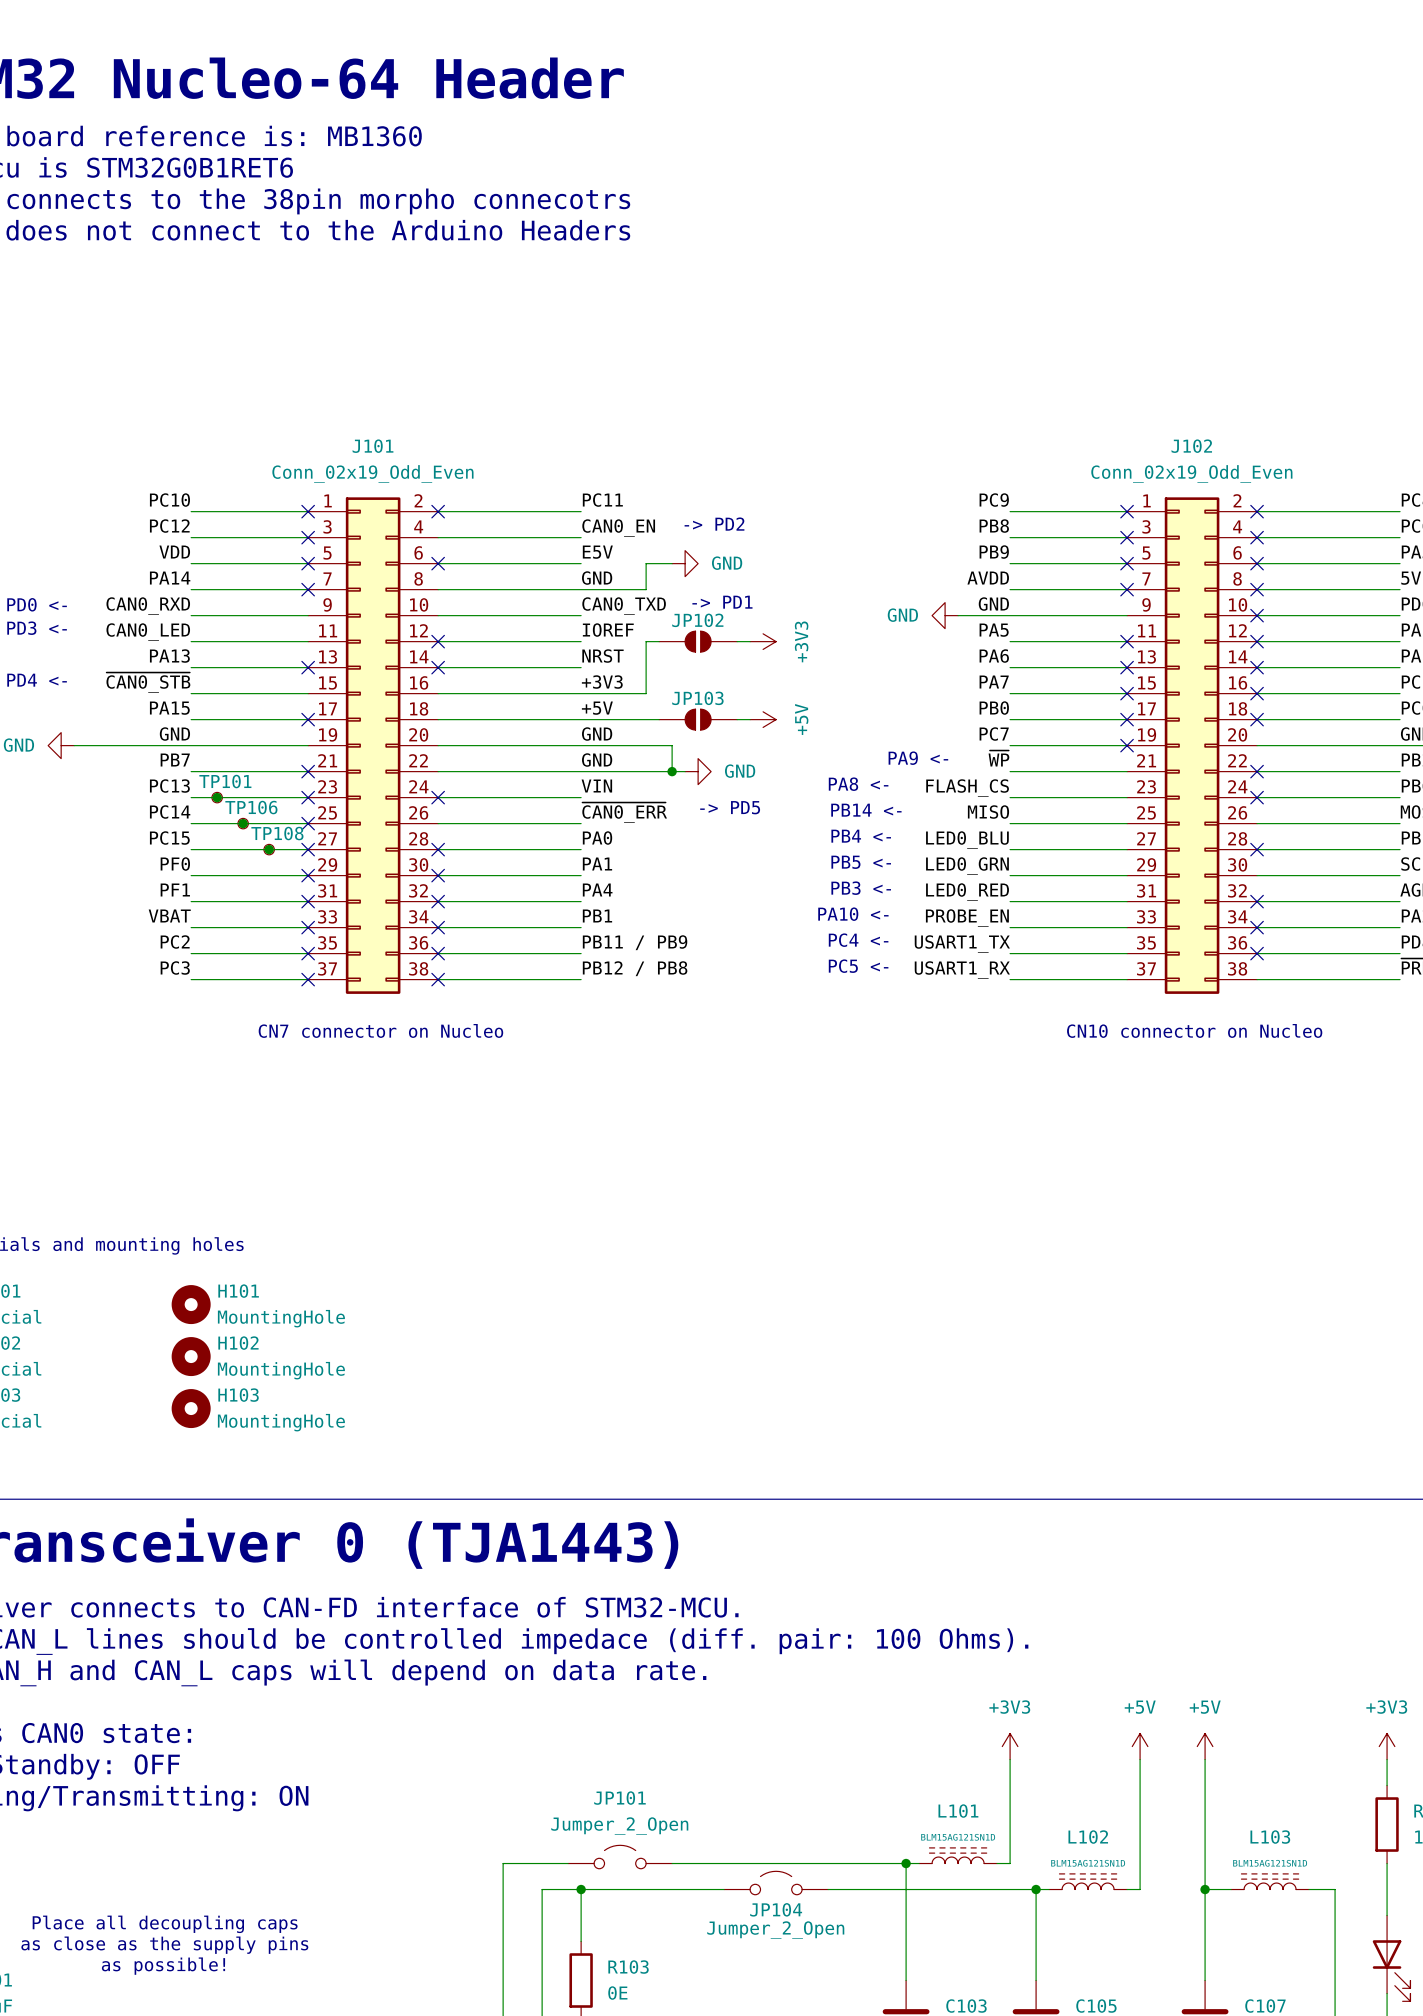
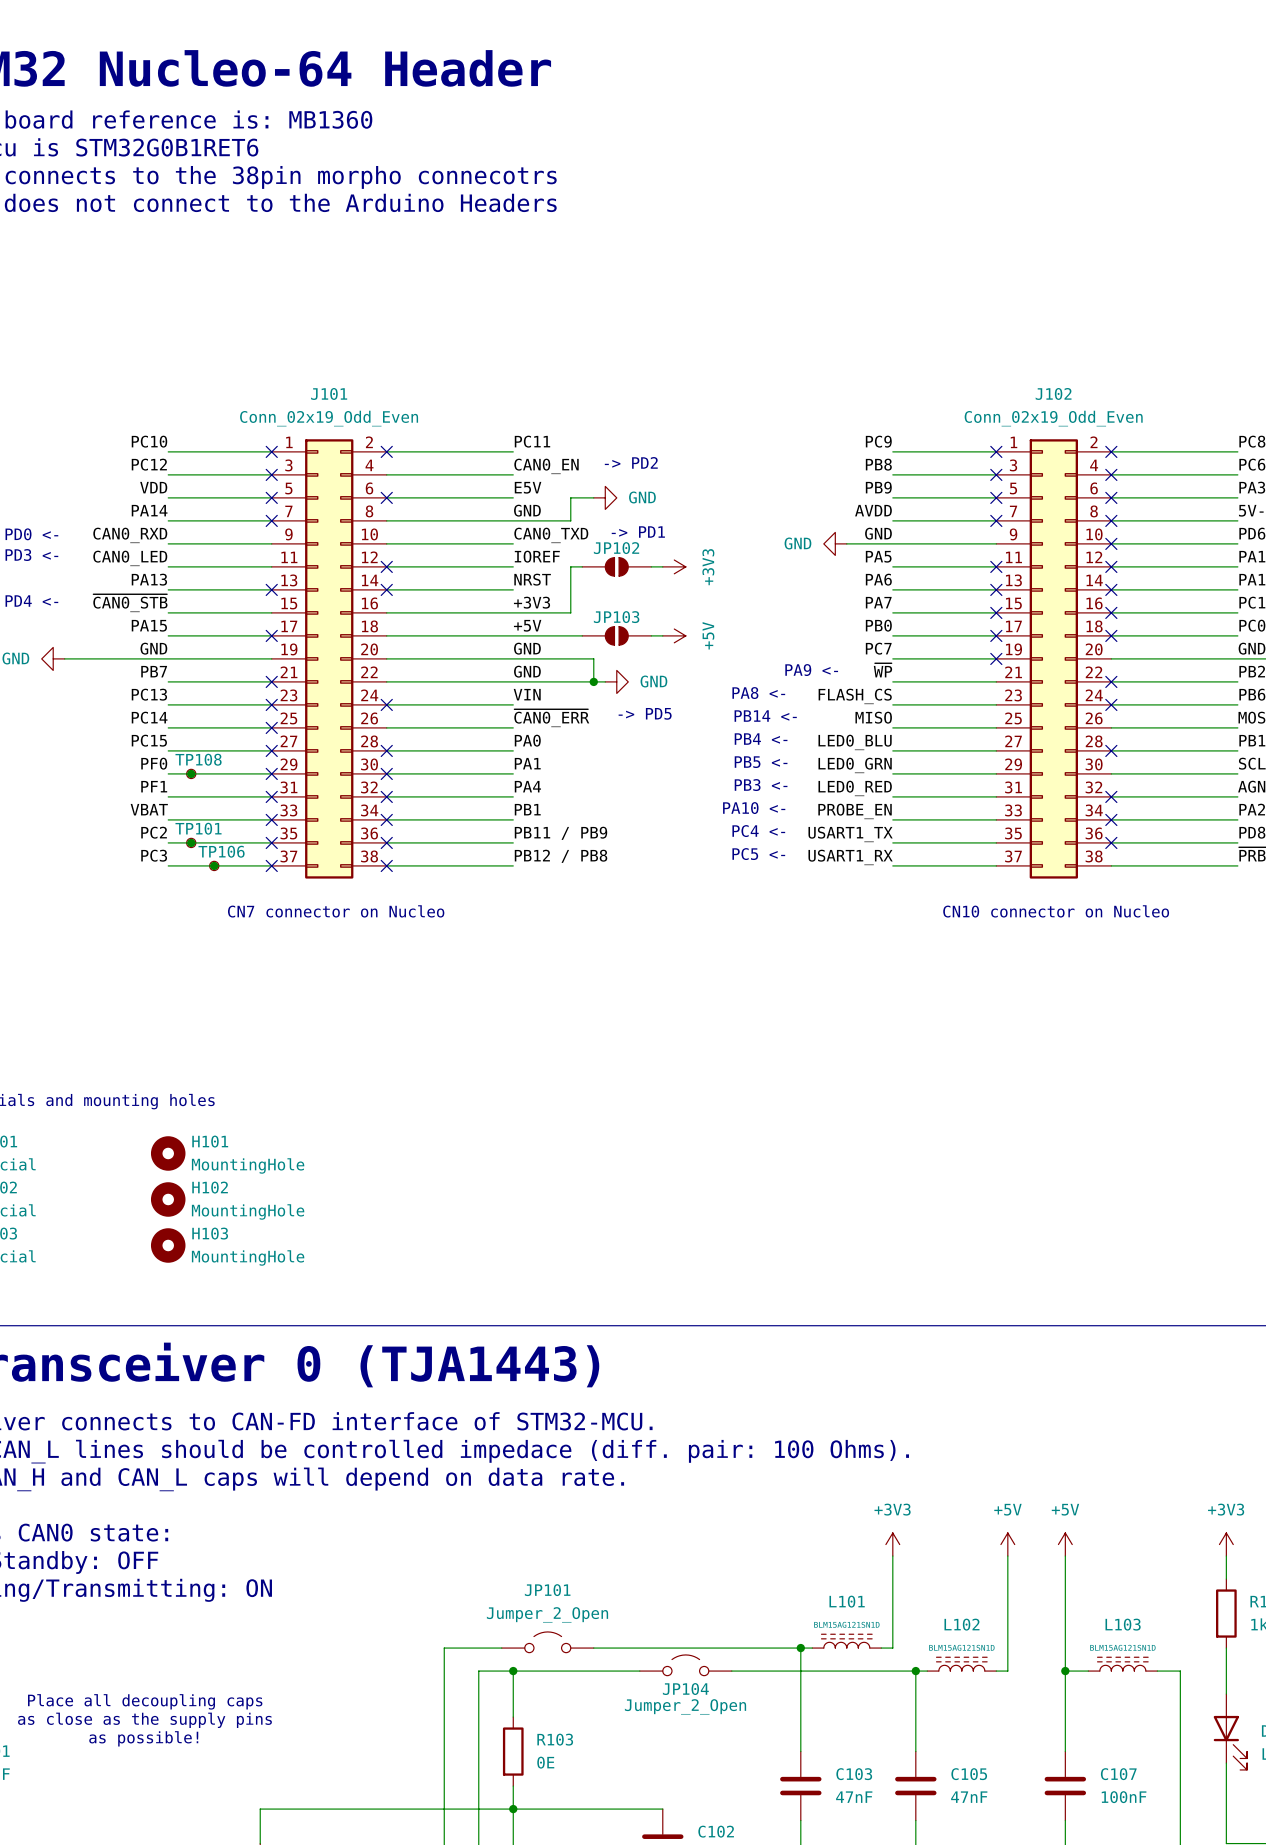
junction: (217, 797) -> none
TP101 position: (217, 797) -> (191, 842)
junction: (243, 823) -> none
TP106 position: (243, 823) -> (214, 865)
junction: (269, 849) -> none
TP108 position: (269, 849) -> (191, 773)
junction: none -> (191, 773)
junction: none -> (191, 842)
junction: none -> (214, 865)

